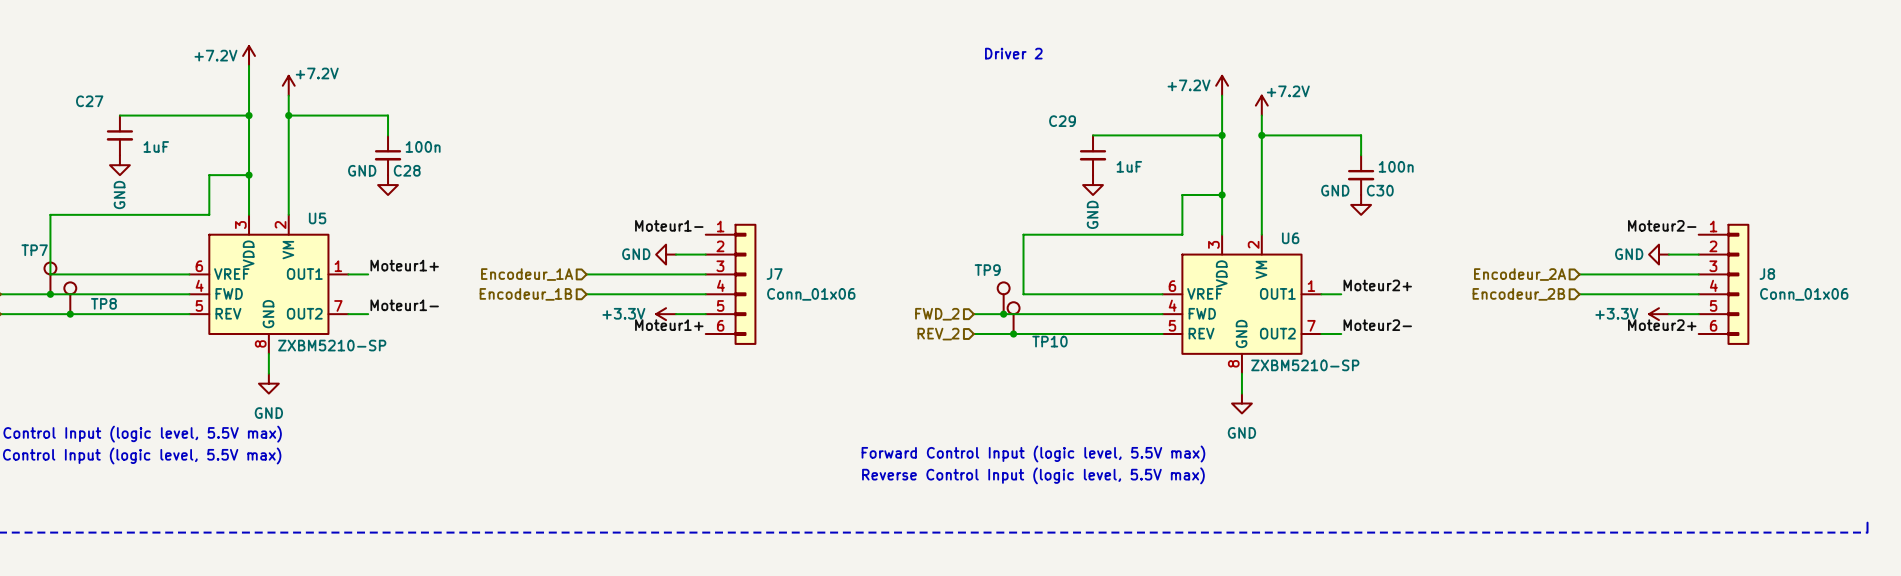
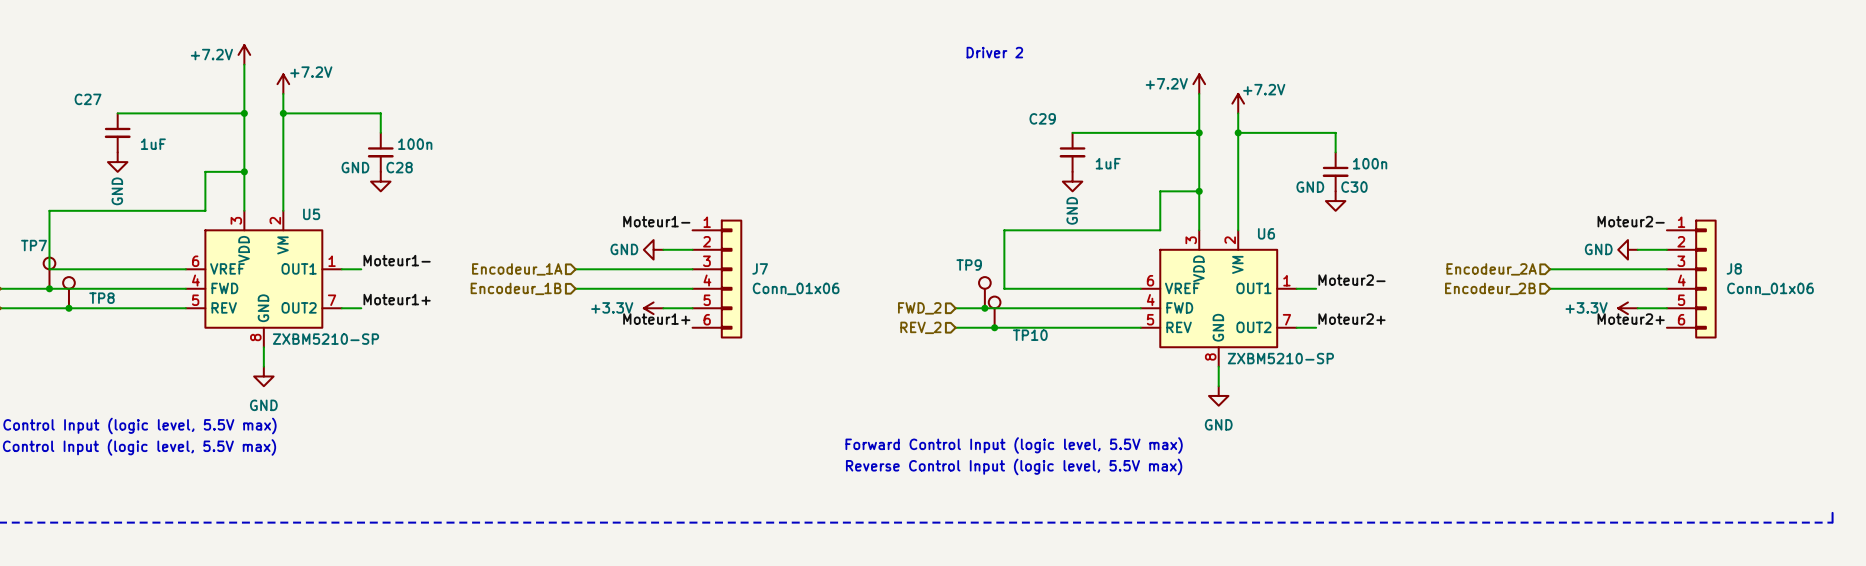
label: Moteur1+ (404, 265) -> Moteur1- (397, 260)
label: Moteur2+ (1377, 285) -> Moteur2- (1351, 280)
label: Moteur1- (404, 305) -> Moteur1+ (397, 299)
label: Moteur2- (1377, 325) -> Moteur2+ (1351, 319)

